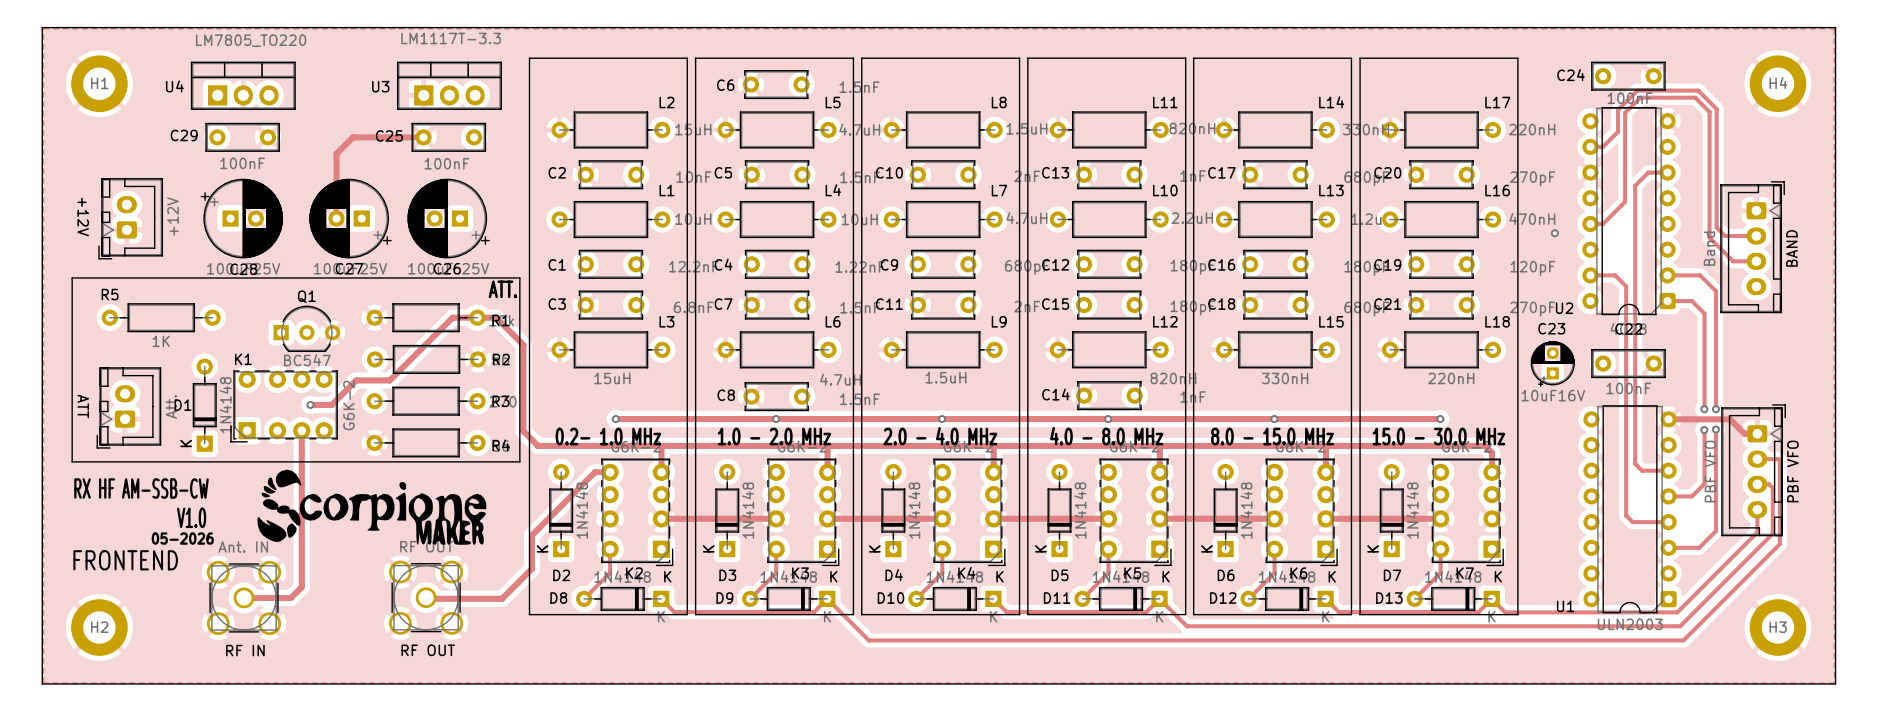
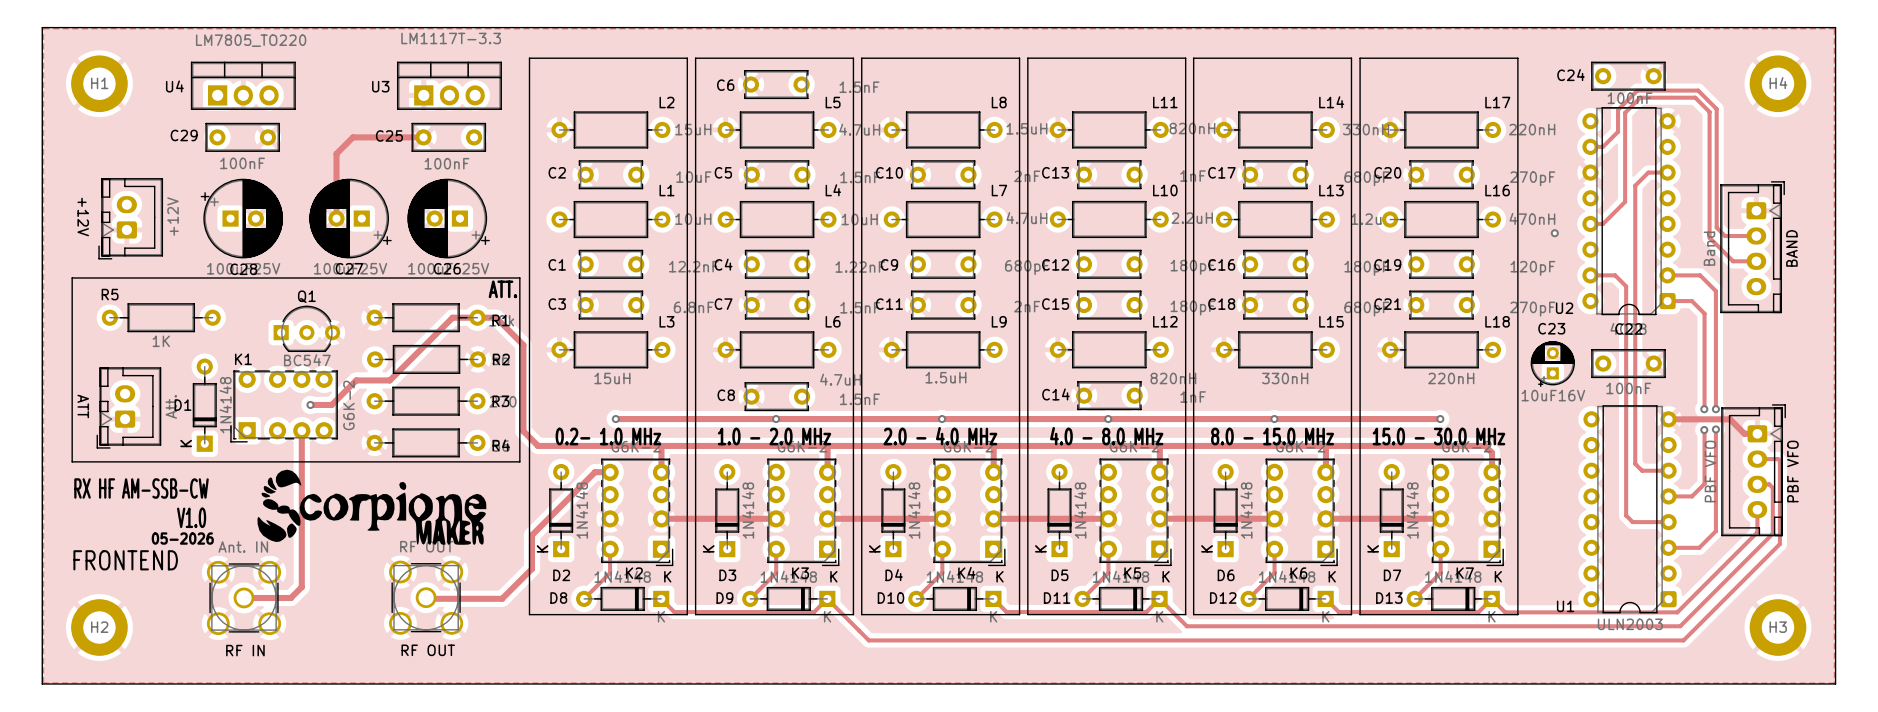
C2 value: 10nF (693, 177) -> 10uF (693, 177)

